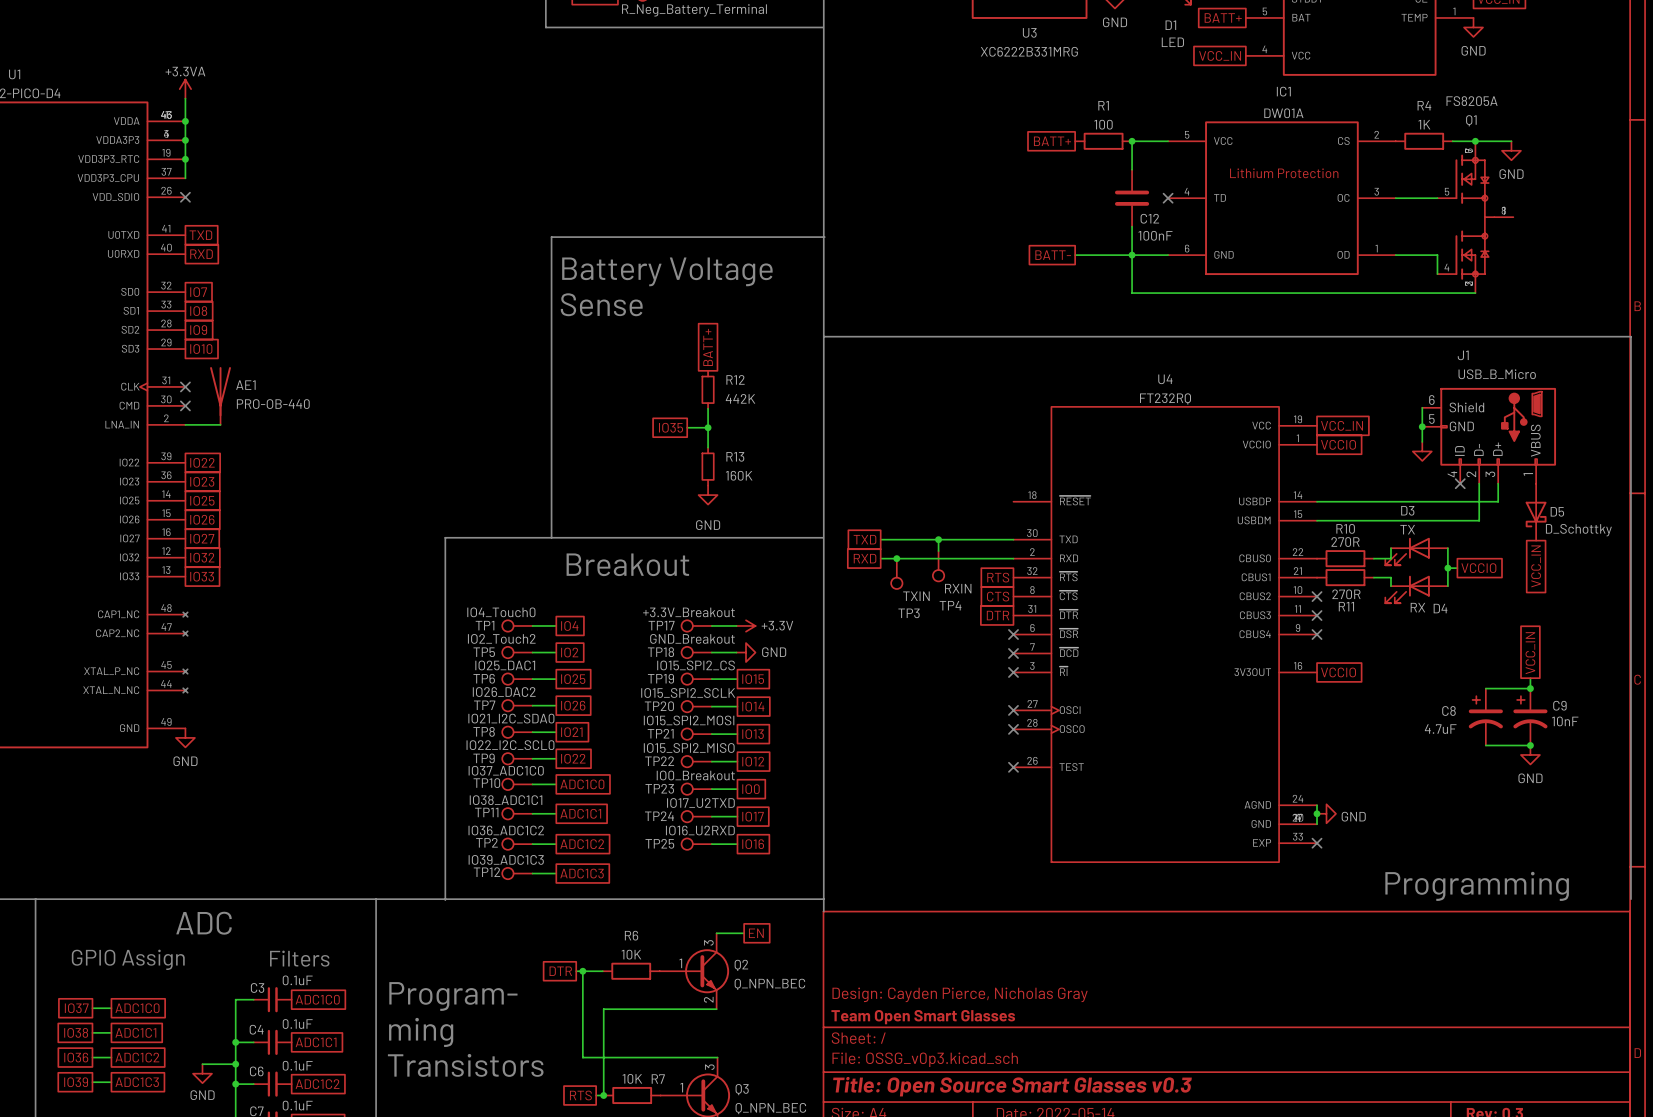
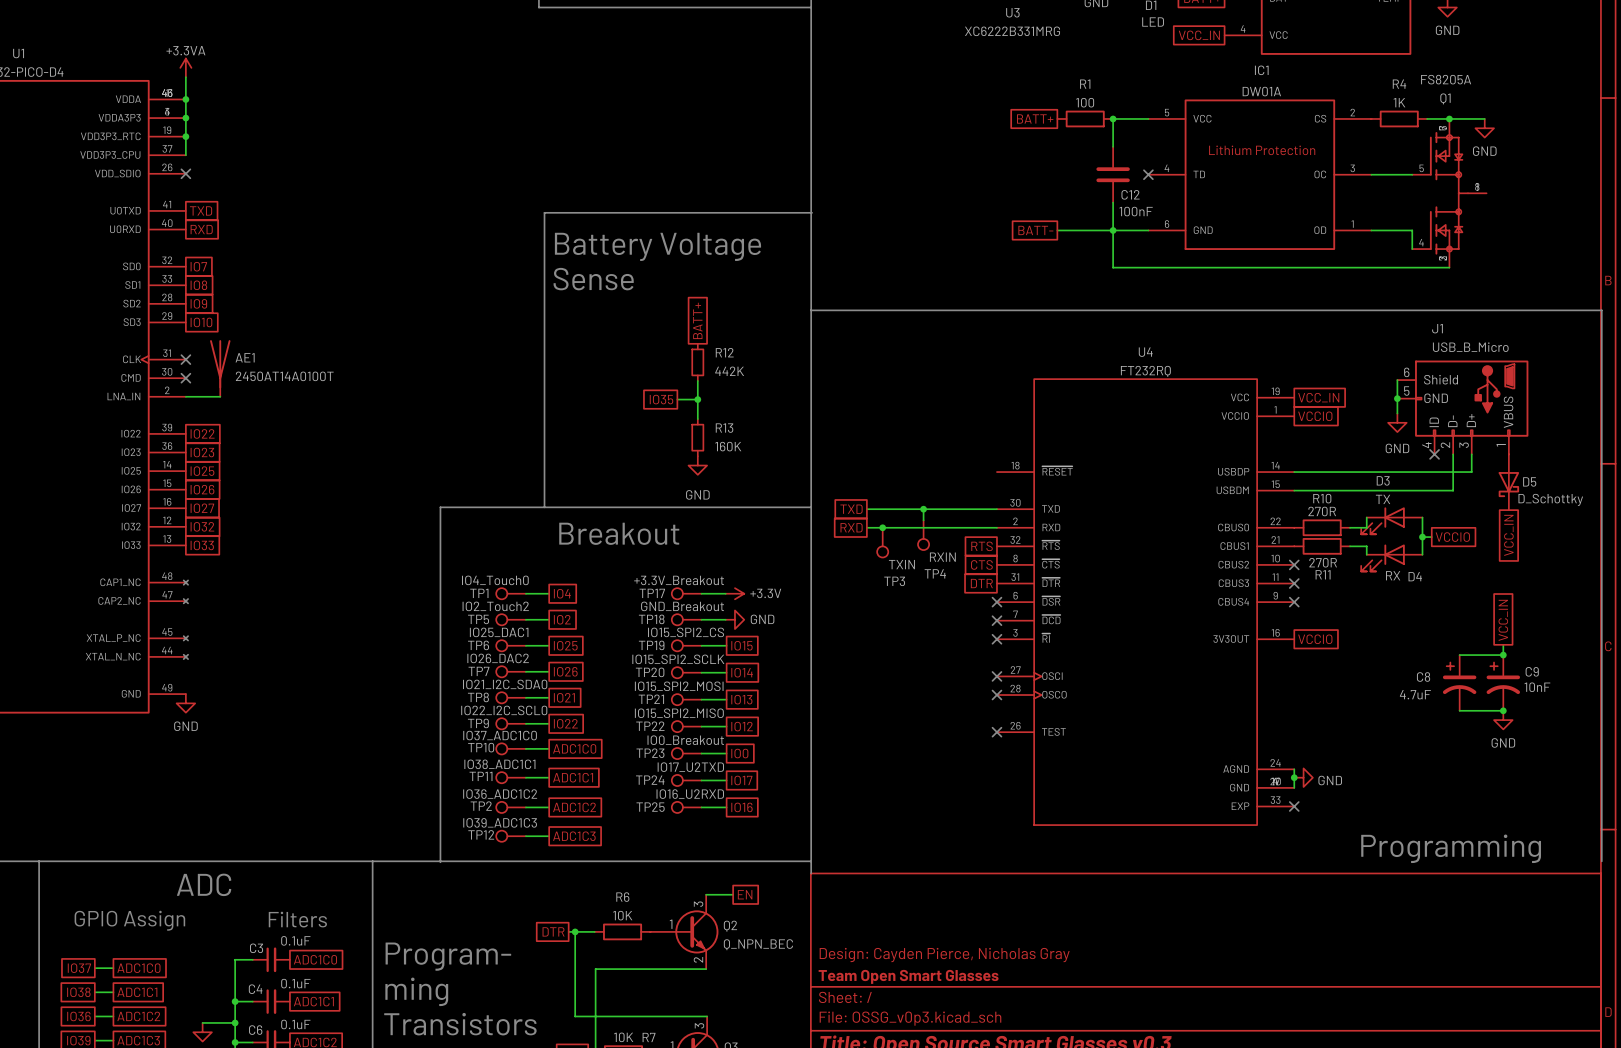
AE1 value: PRO-OB-440 (273, 404) -> 2450AT14A0100T (284, 376)
power symbol text: none -> GND (1397, 448)

